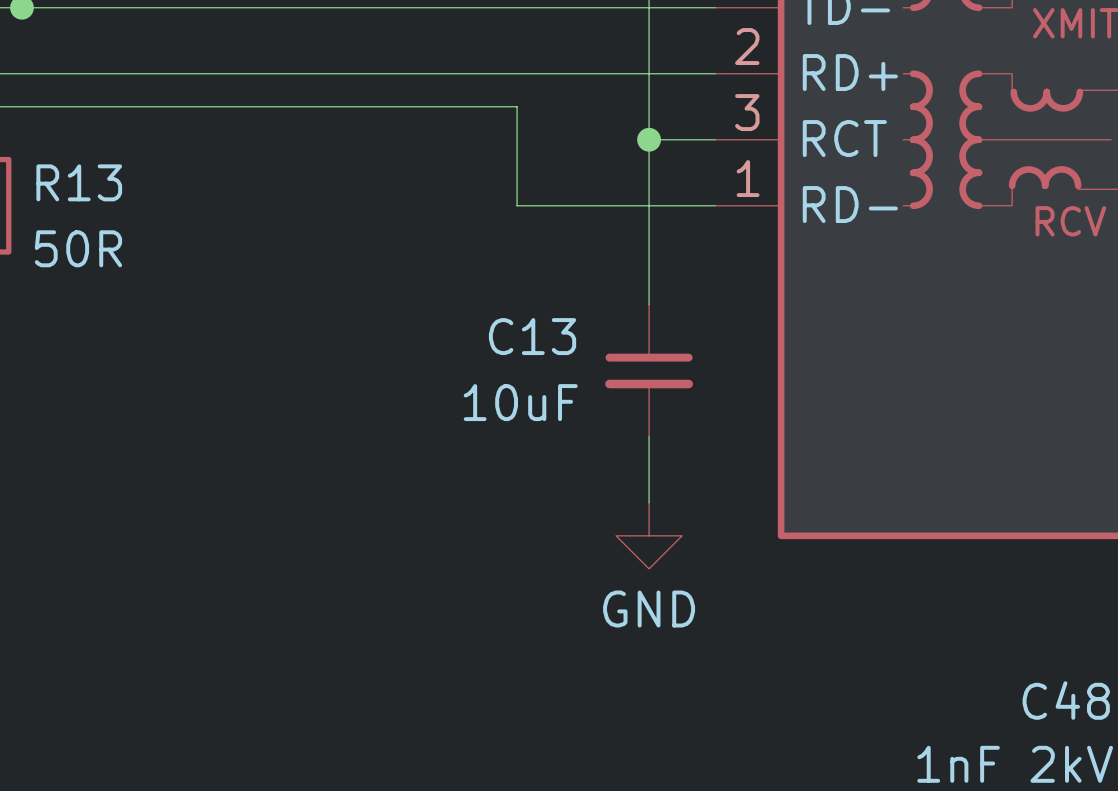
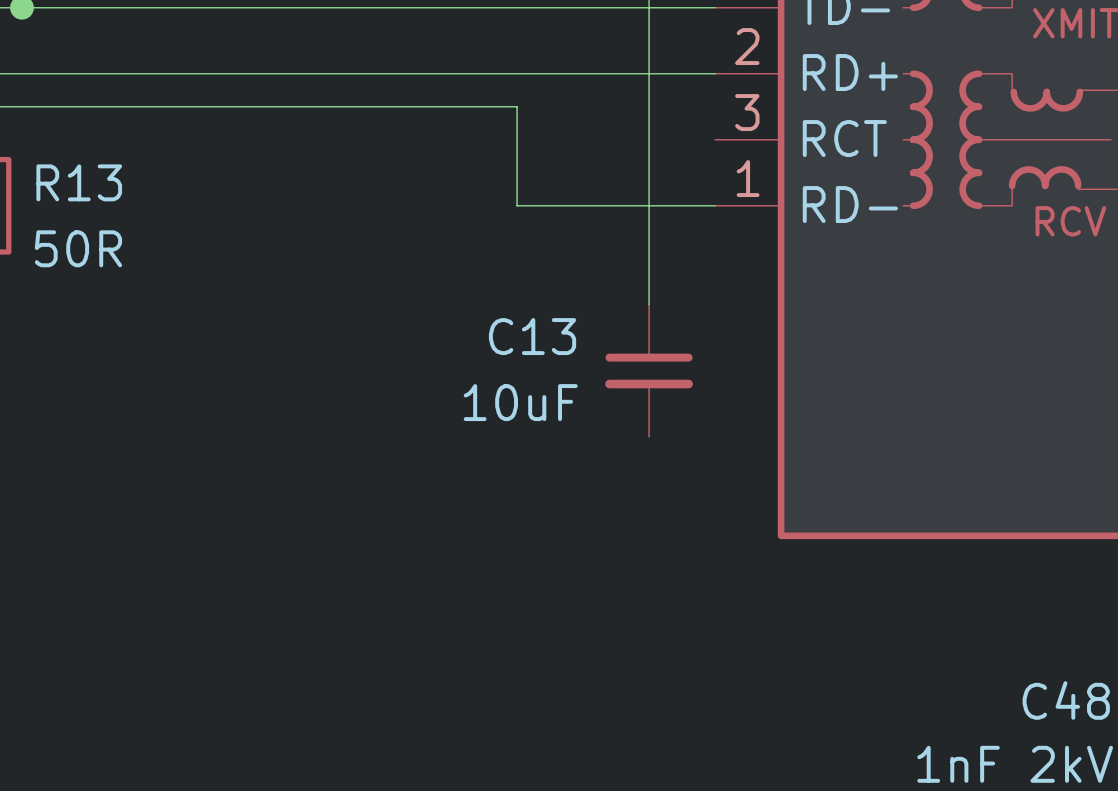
wire: (649, 139) (715, 139) -> none
junction: (649, 139) -> none
wire: (649, 436) (649, 502) -> none
power symbol: GND (649, 535) -> none

